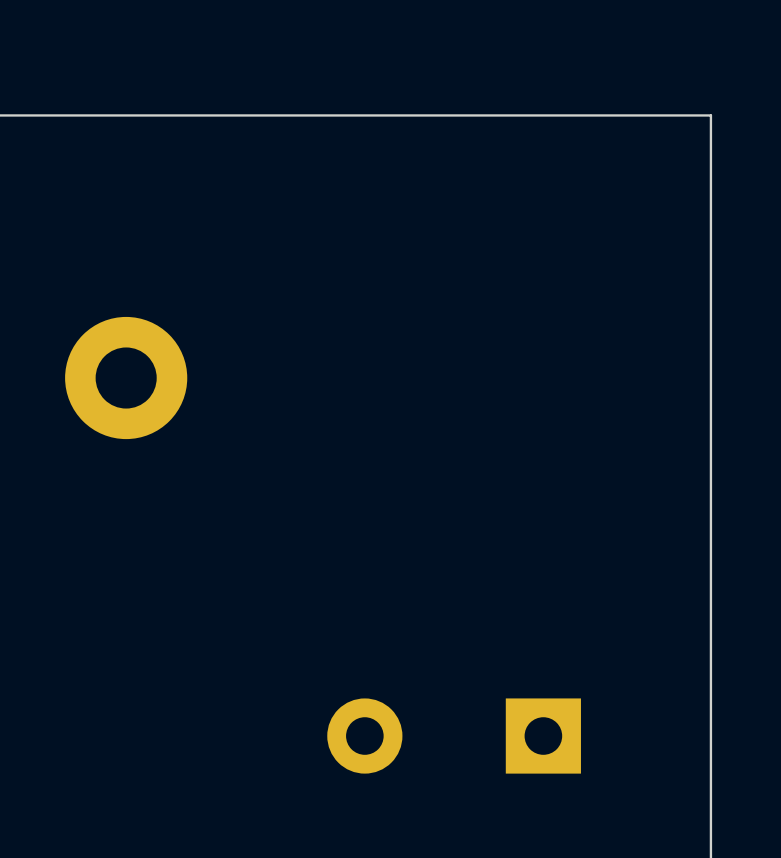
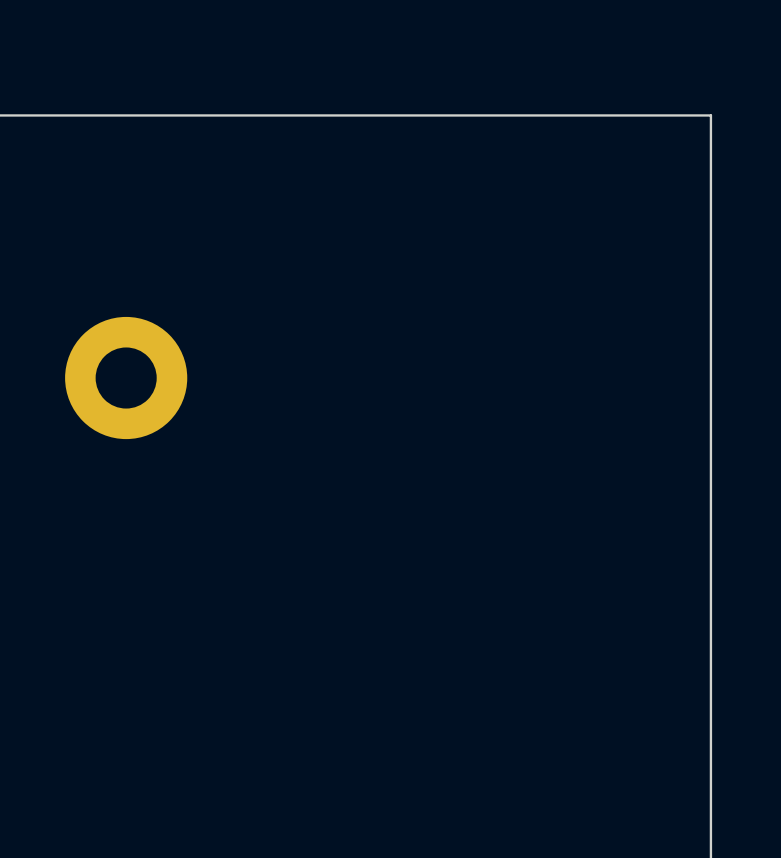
part: (454, 736) -> none

